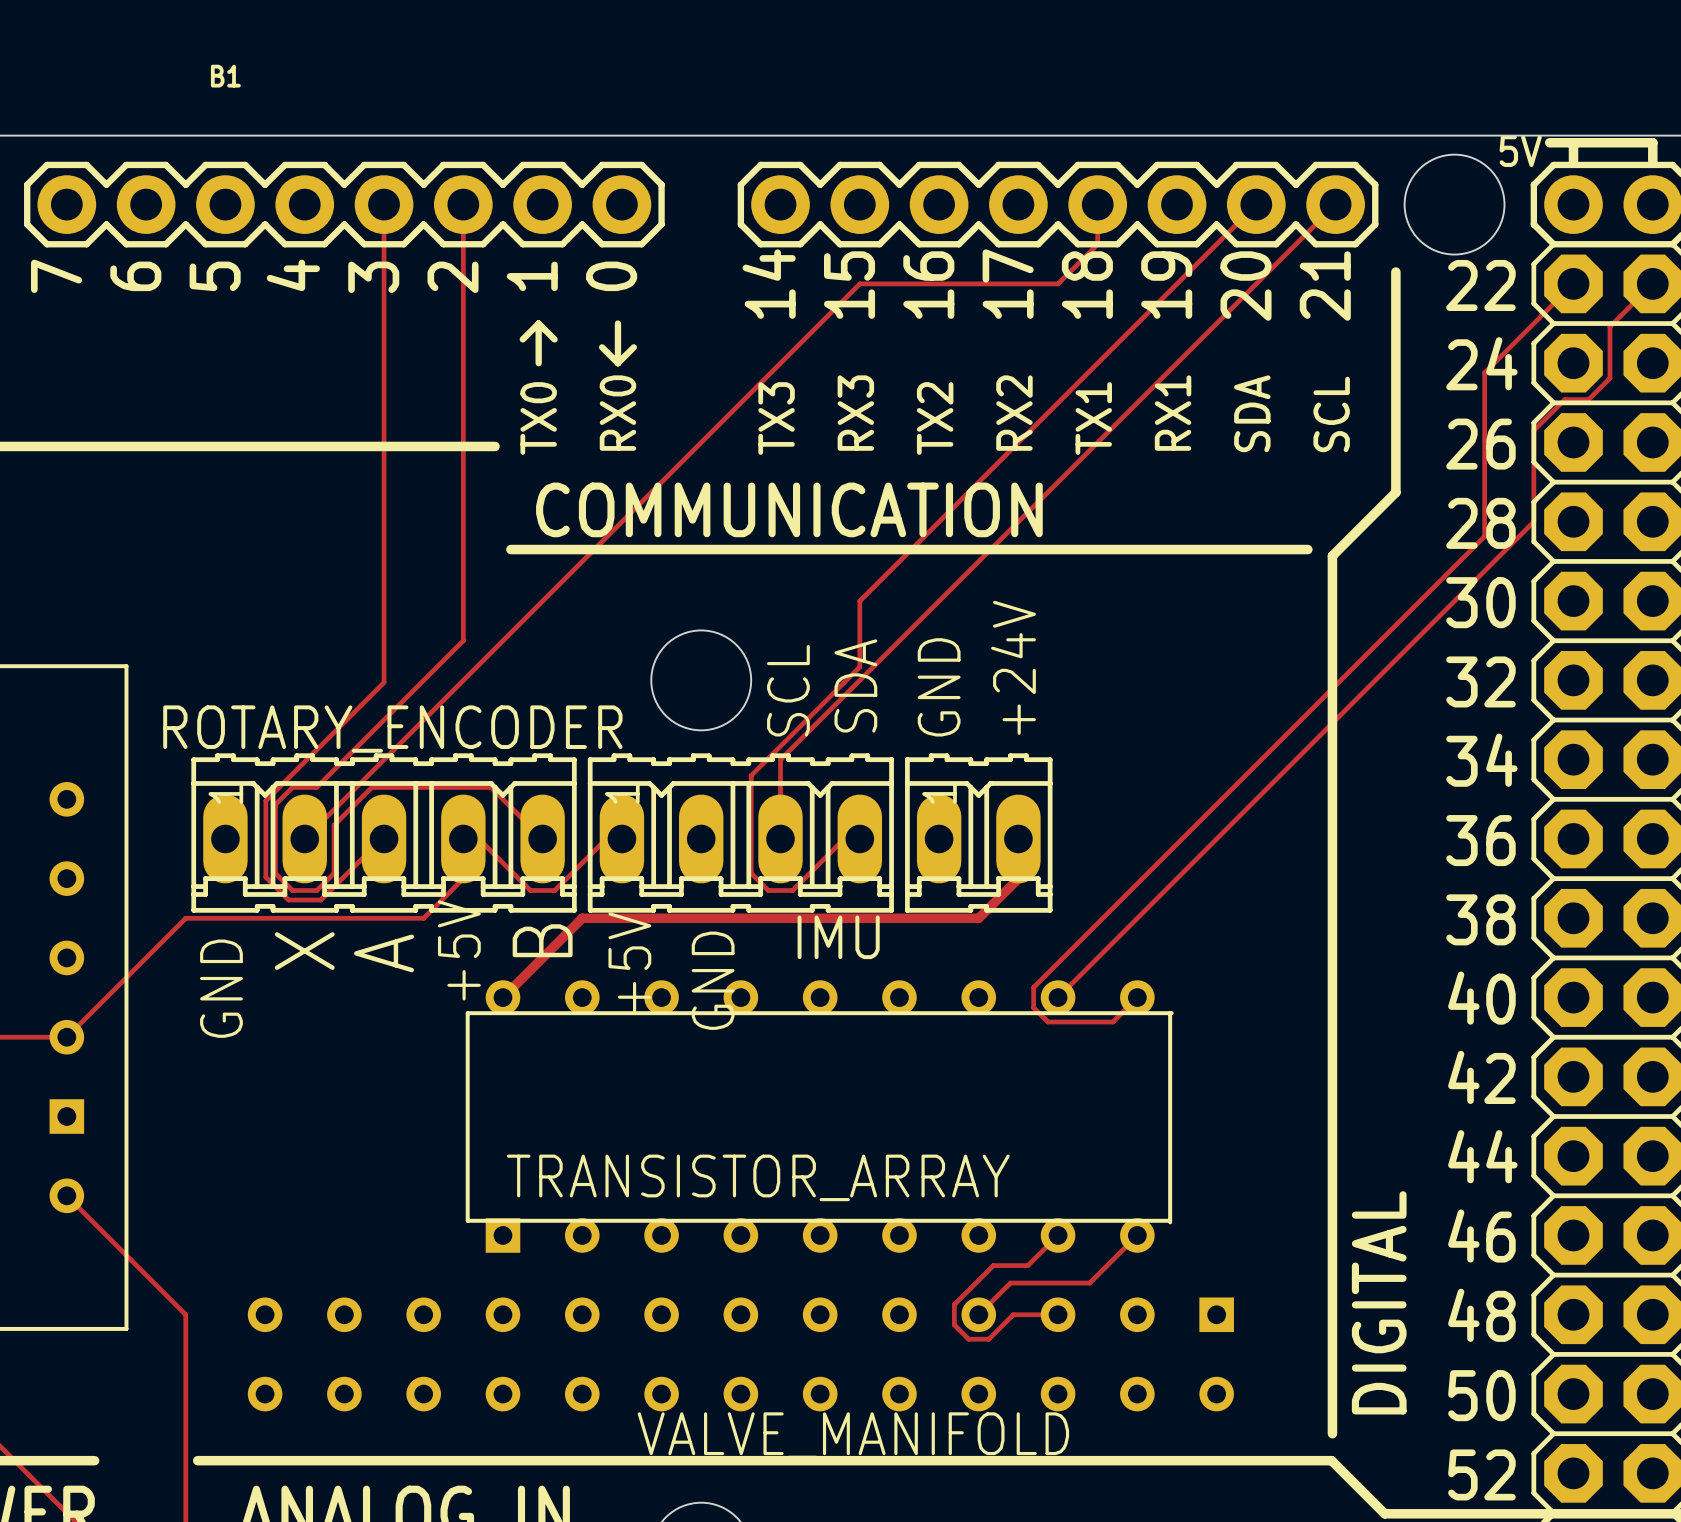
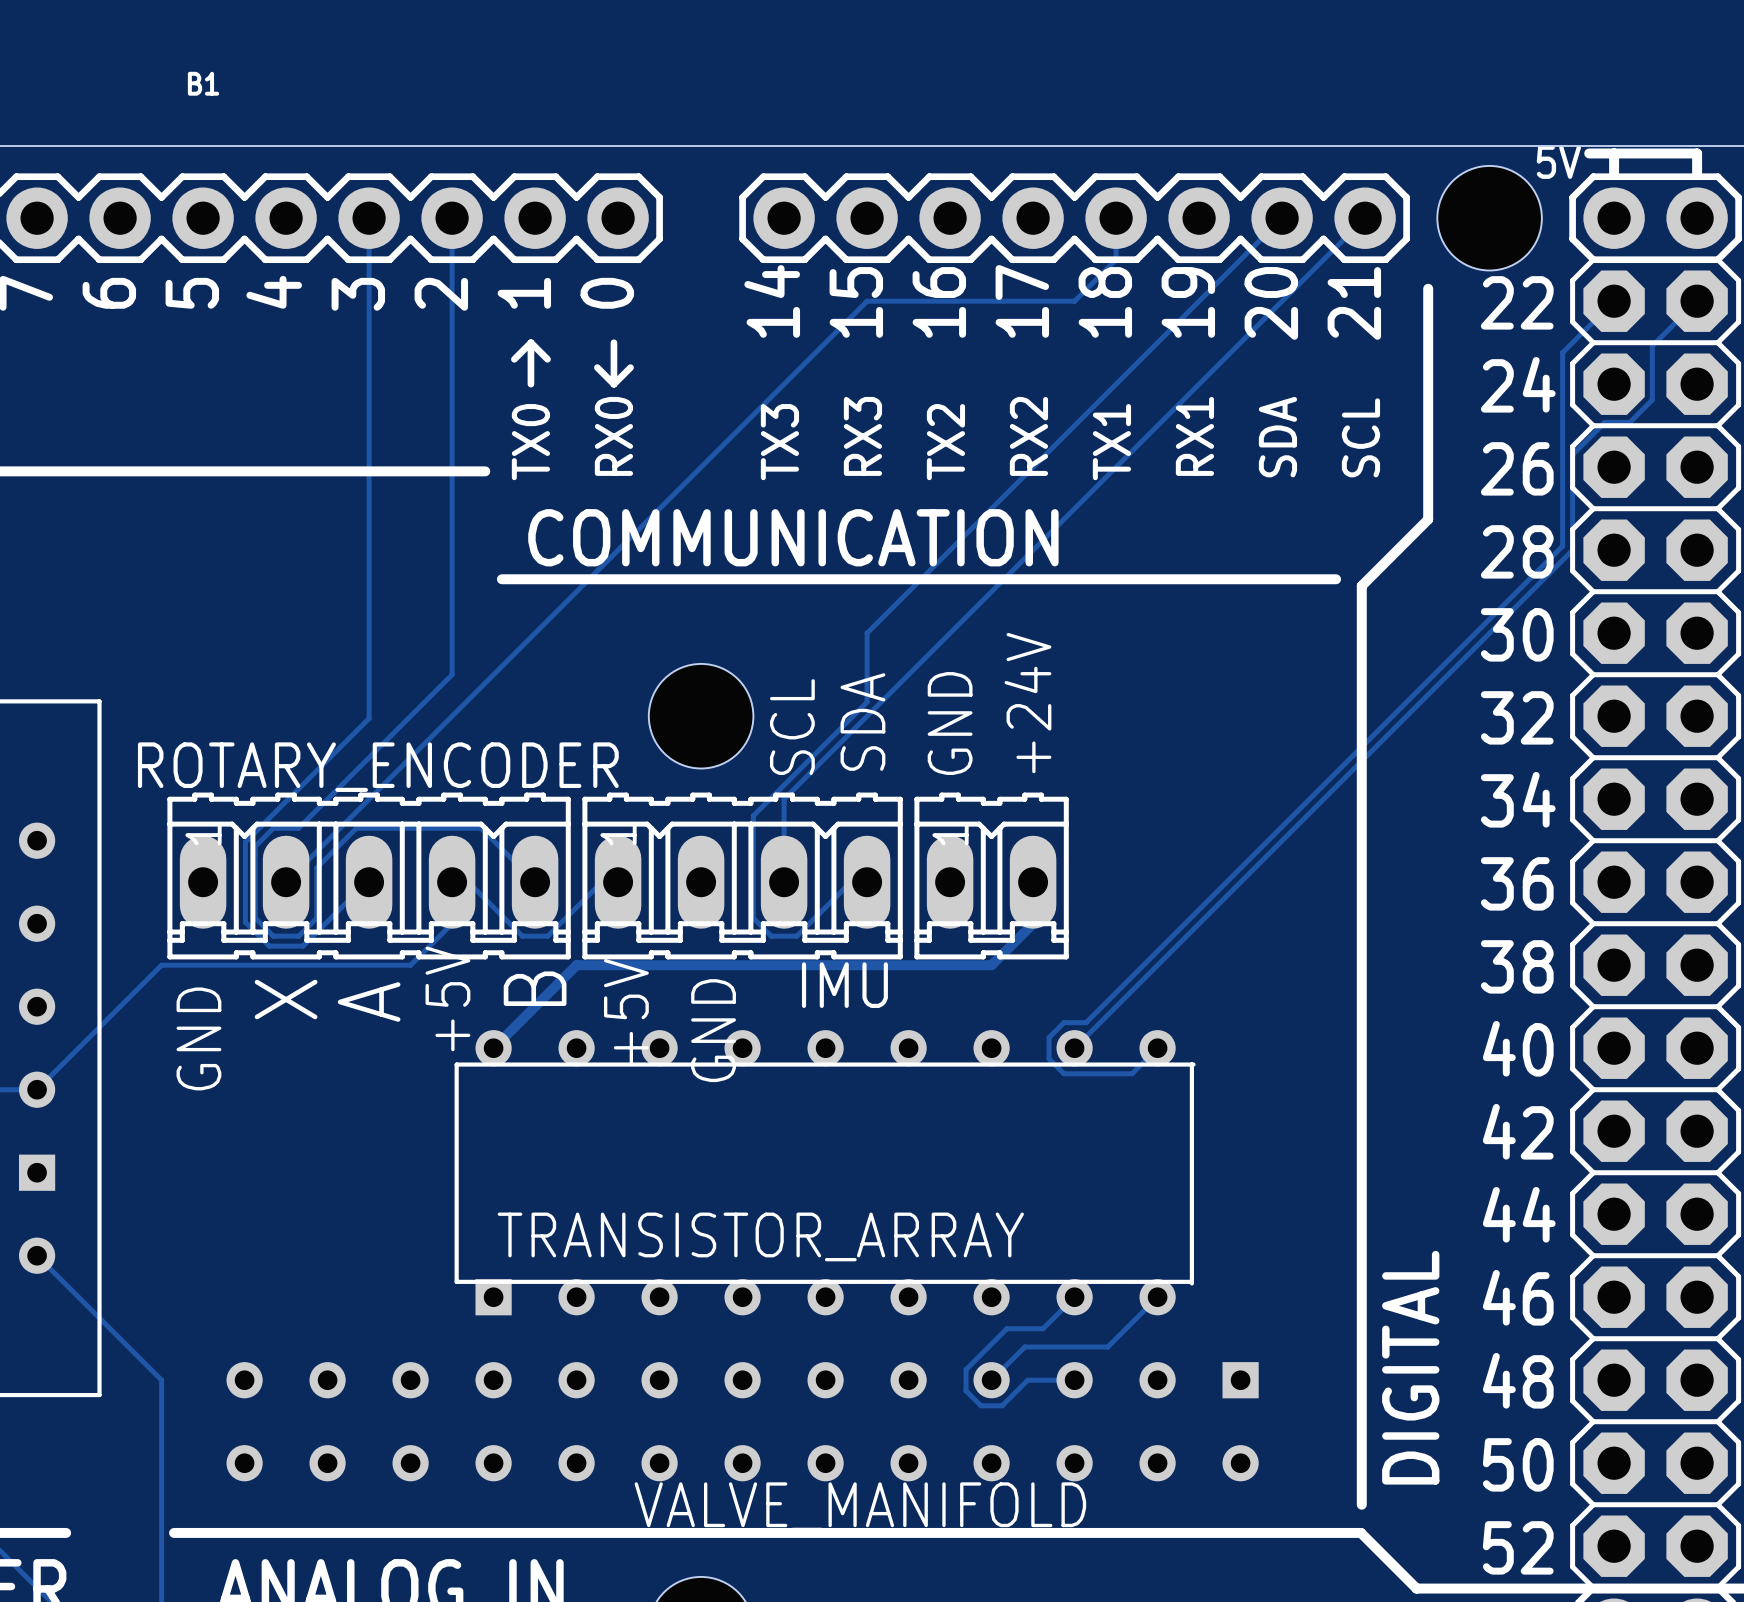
track: (1524, 333) (1484, 372) (1484, 536) (1047, 973) -> (1562, 352) (1562, 546) (1086, 1022) (1064, 1022)

